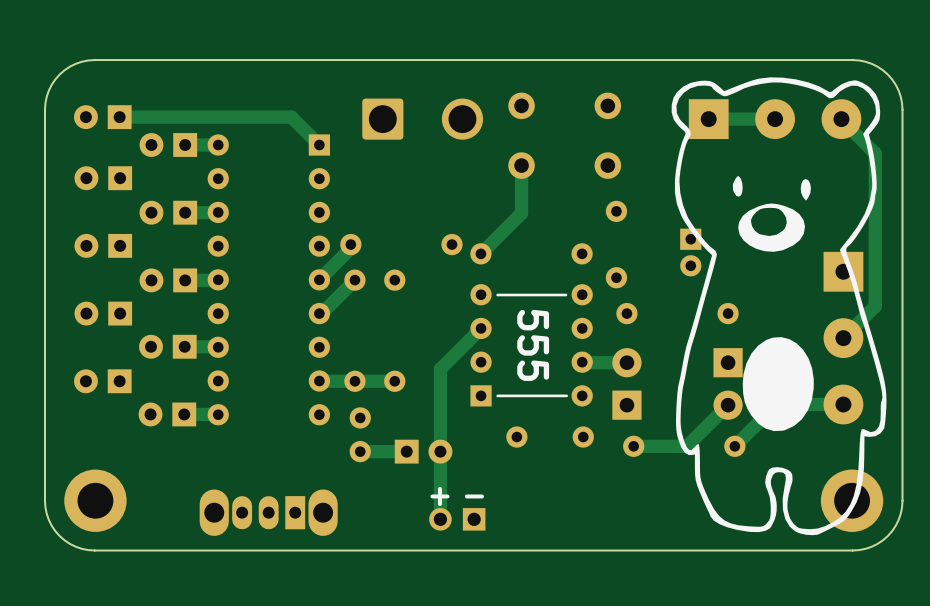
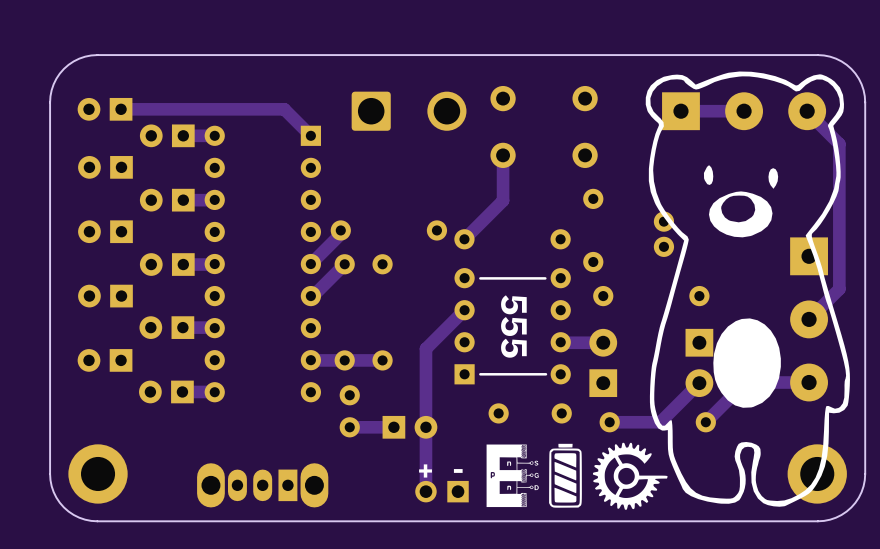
part footprint: [680, 228, 702, 277] -> [653, 211, 675, 257]
drawing: none -> [486, 442, 668, 510]

